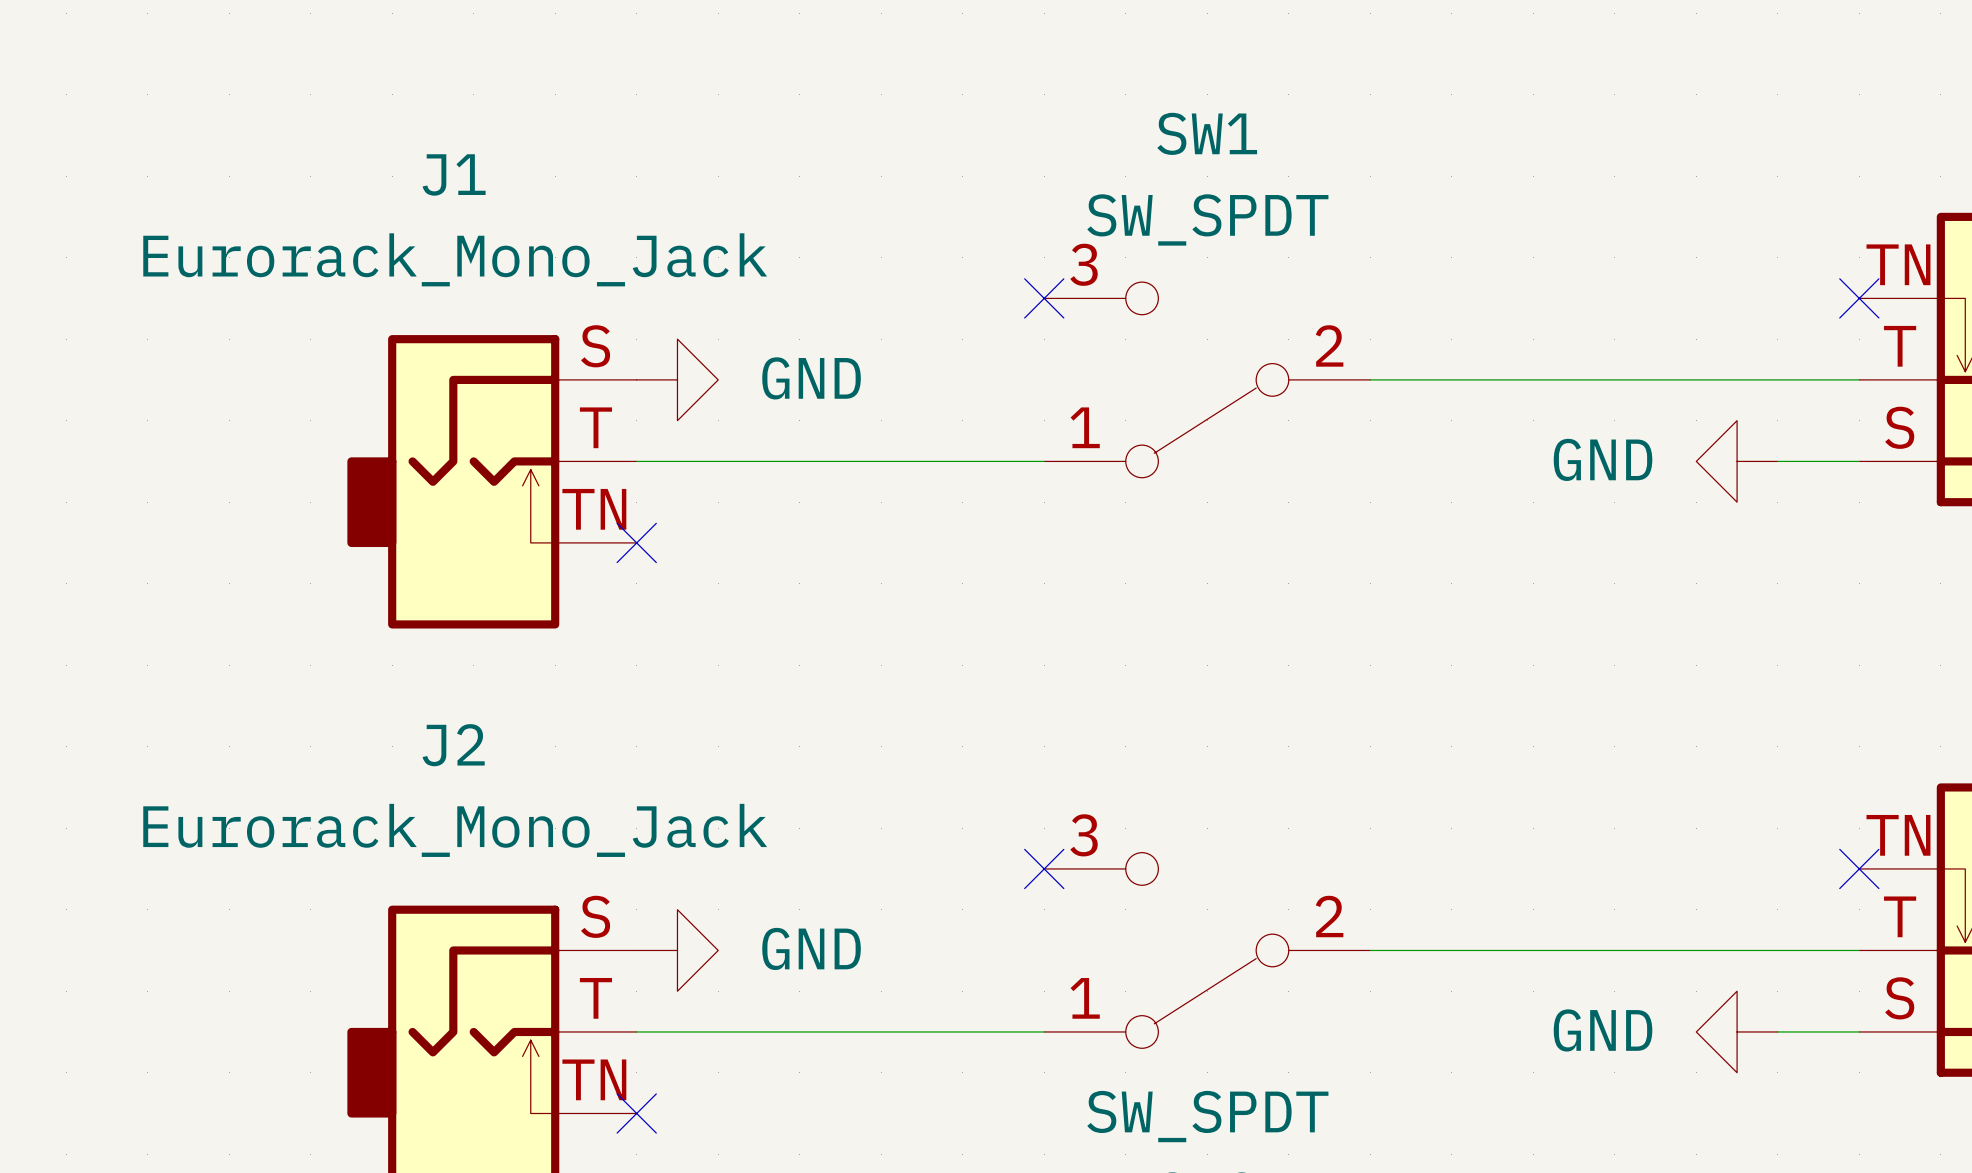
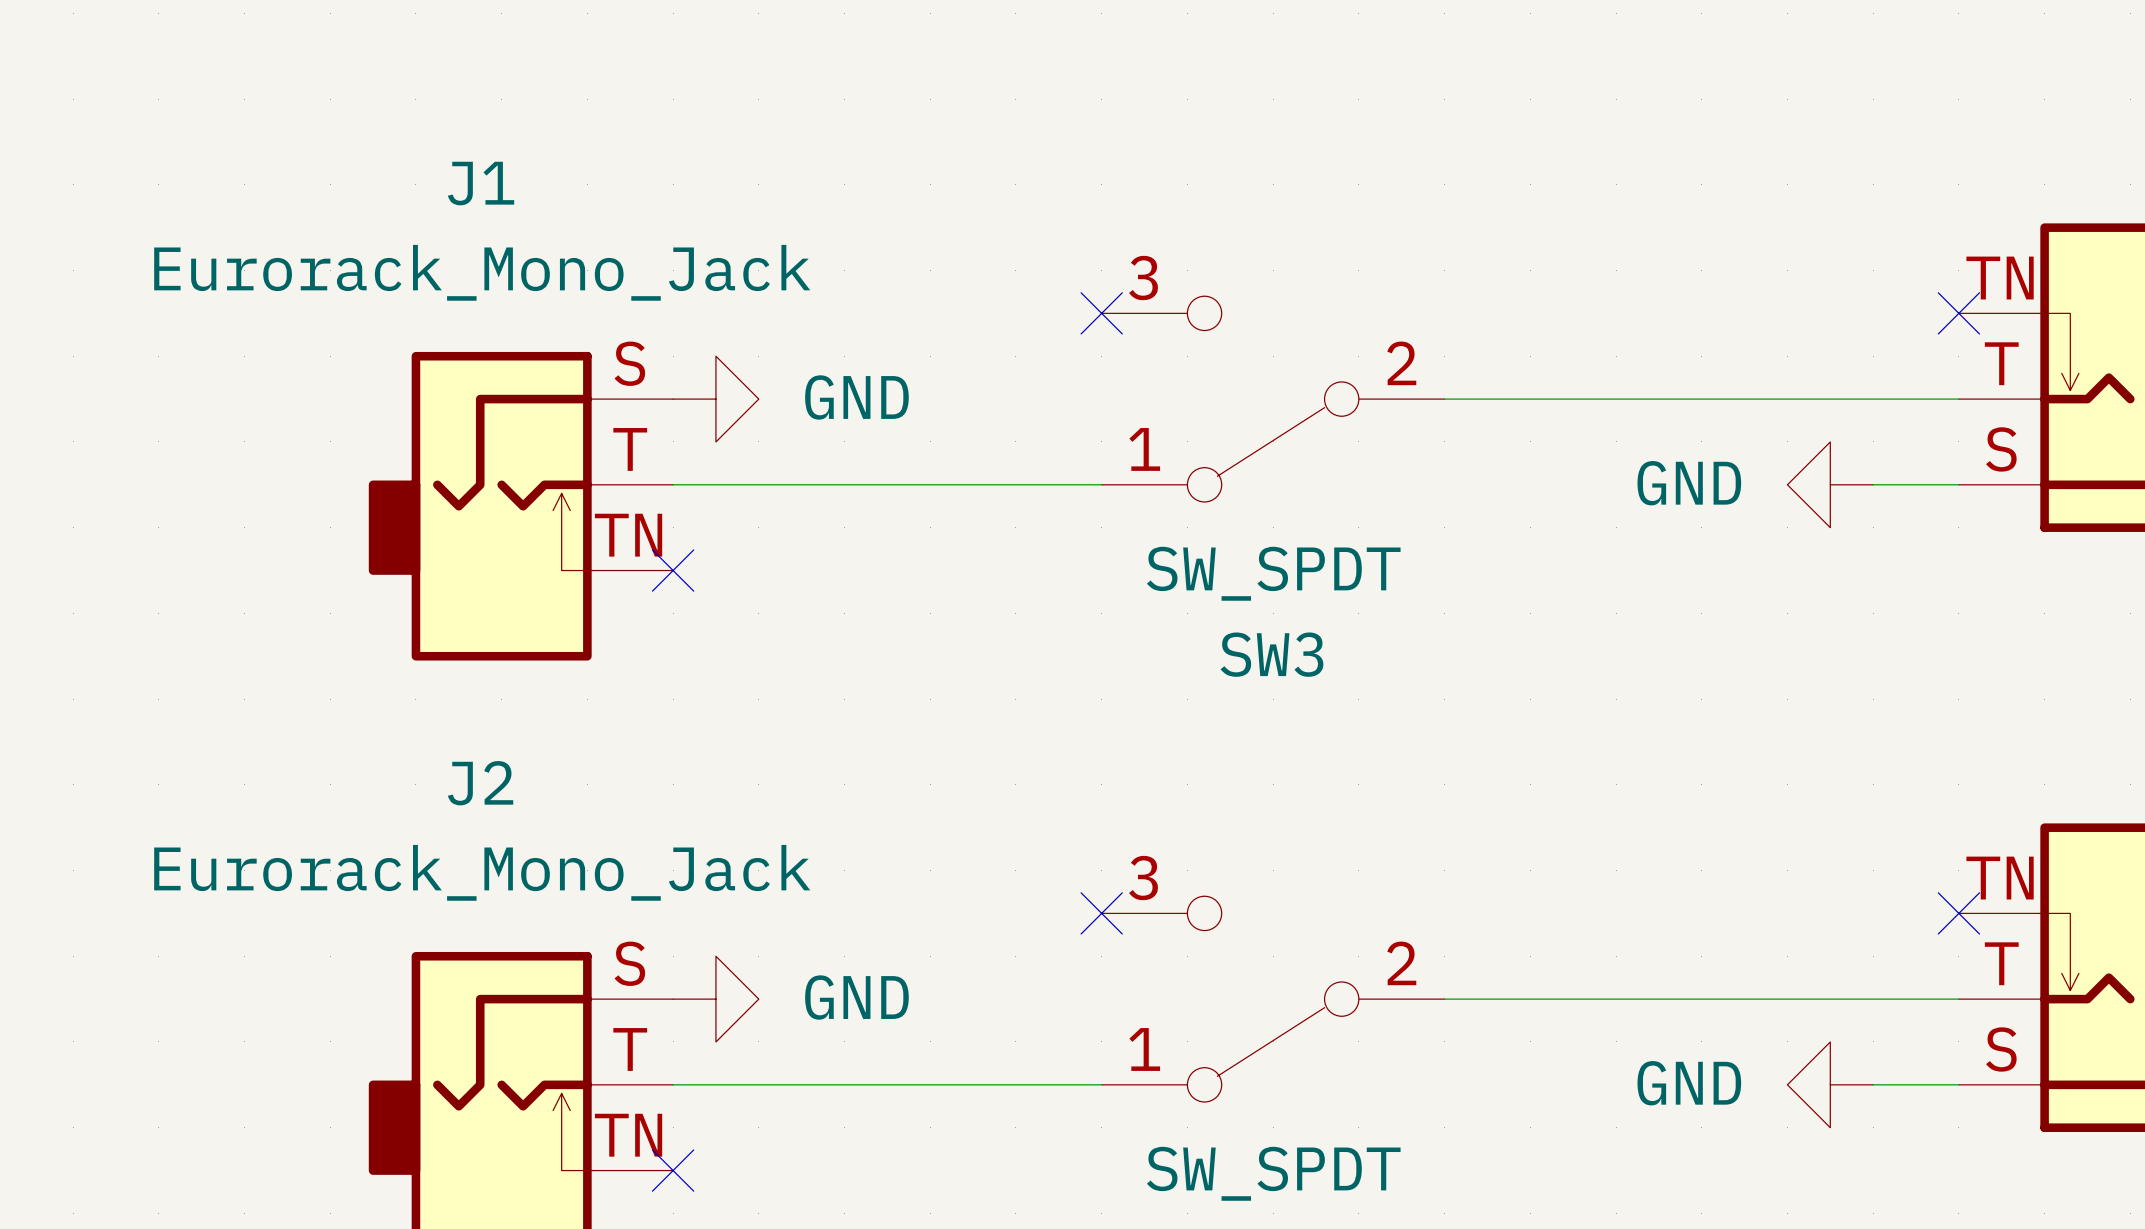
SW1 name: SW1 (1207, 133) -> SW3 (1271, 654)
SW1 value position: SW_SPDT (1207, 219) -> SW_SPDT (1273, 573)

